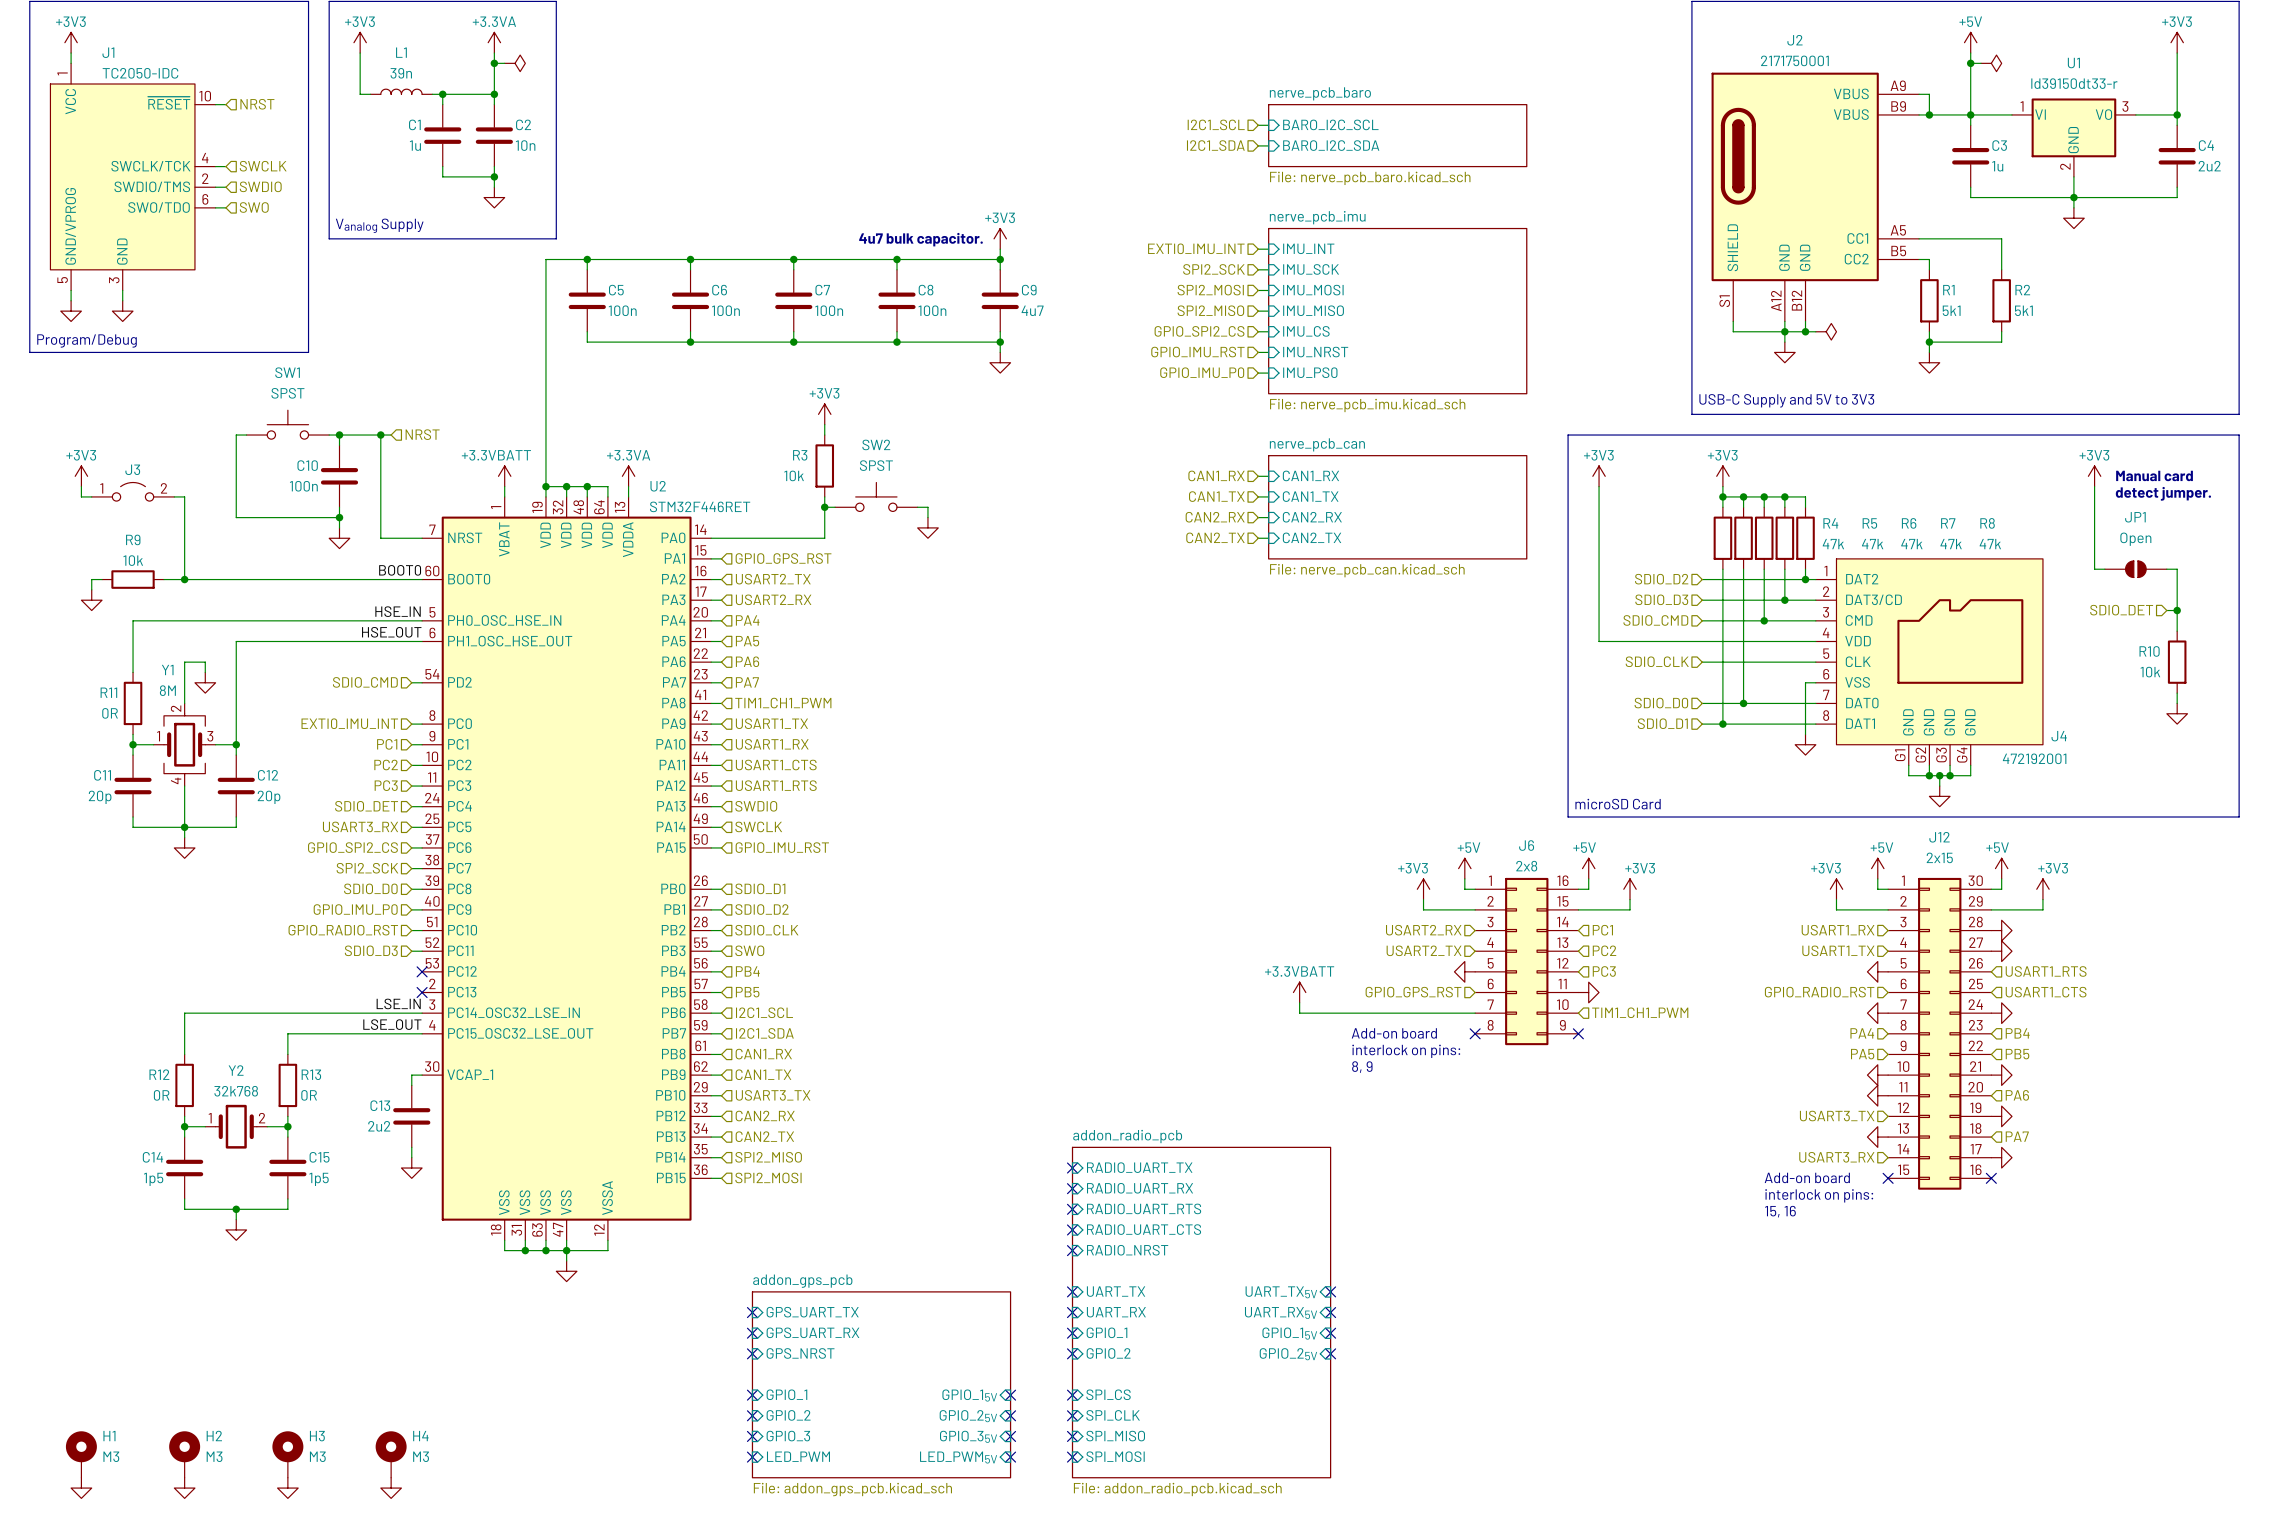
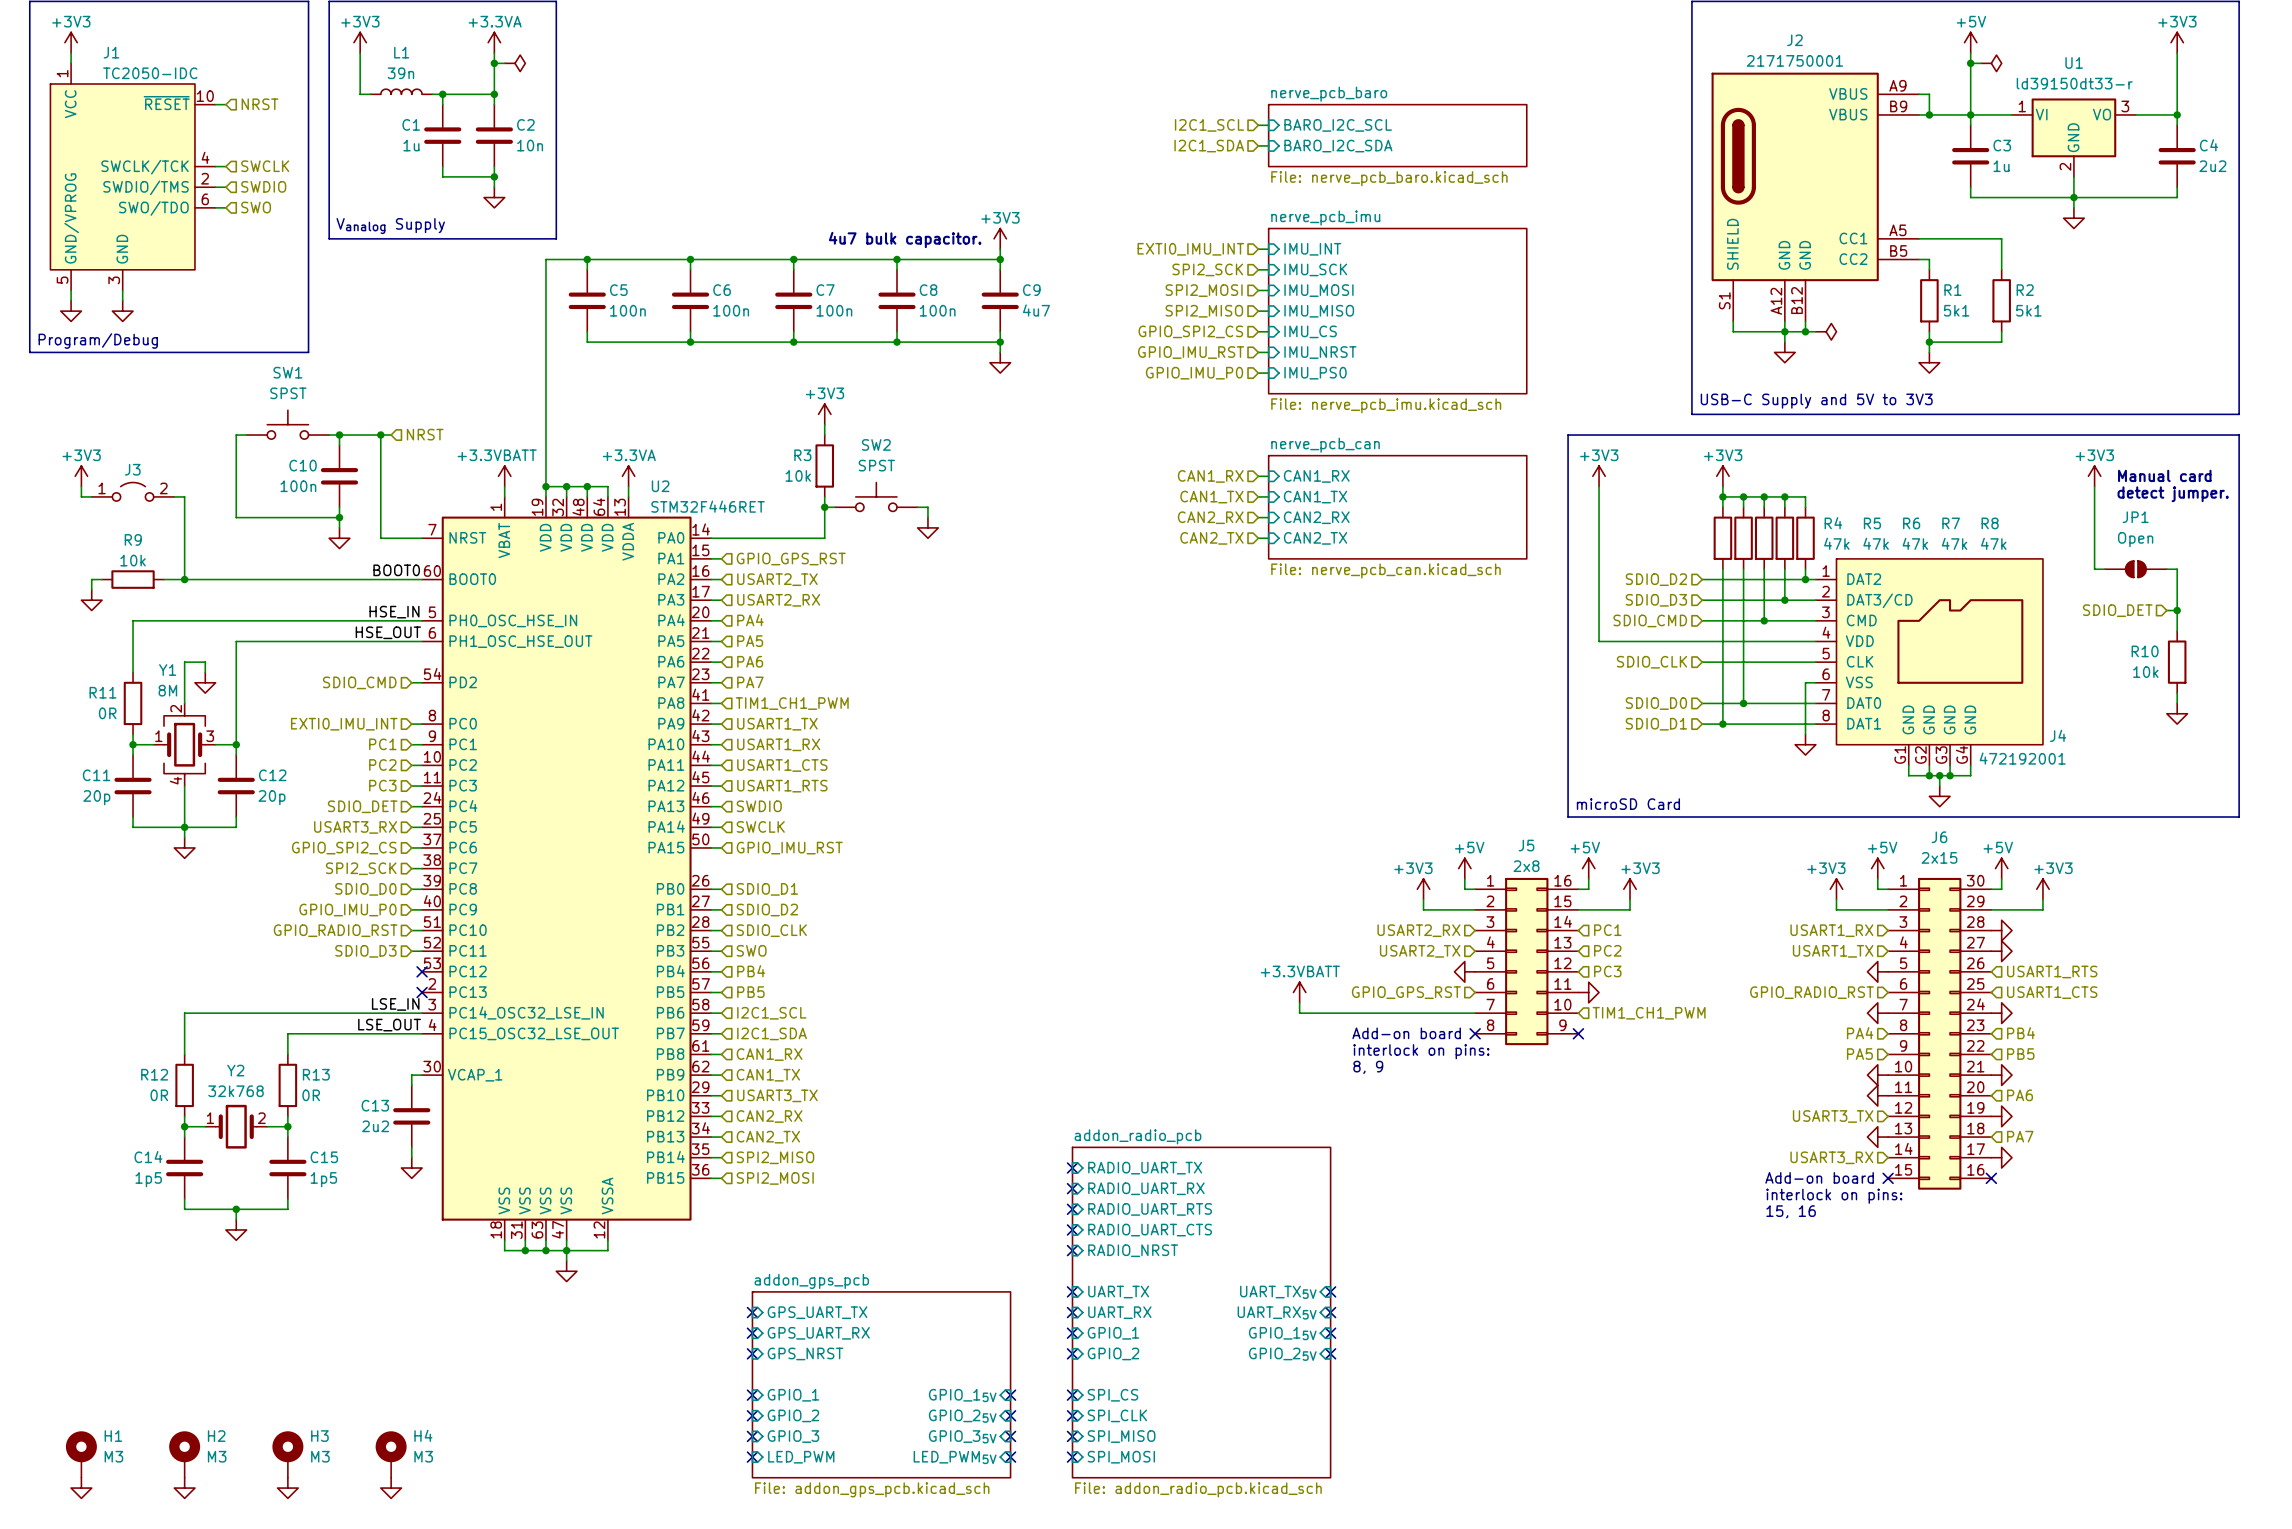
J12 name: J12 (1939, 837) -> J6 (1939, 837)
J6 name: J6 (1526, 845) -> J5 (1526, 845)

